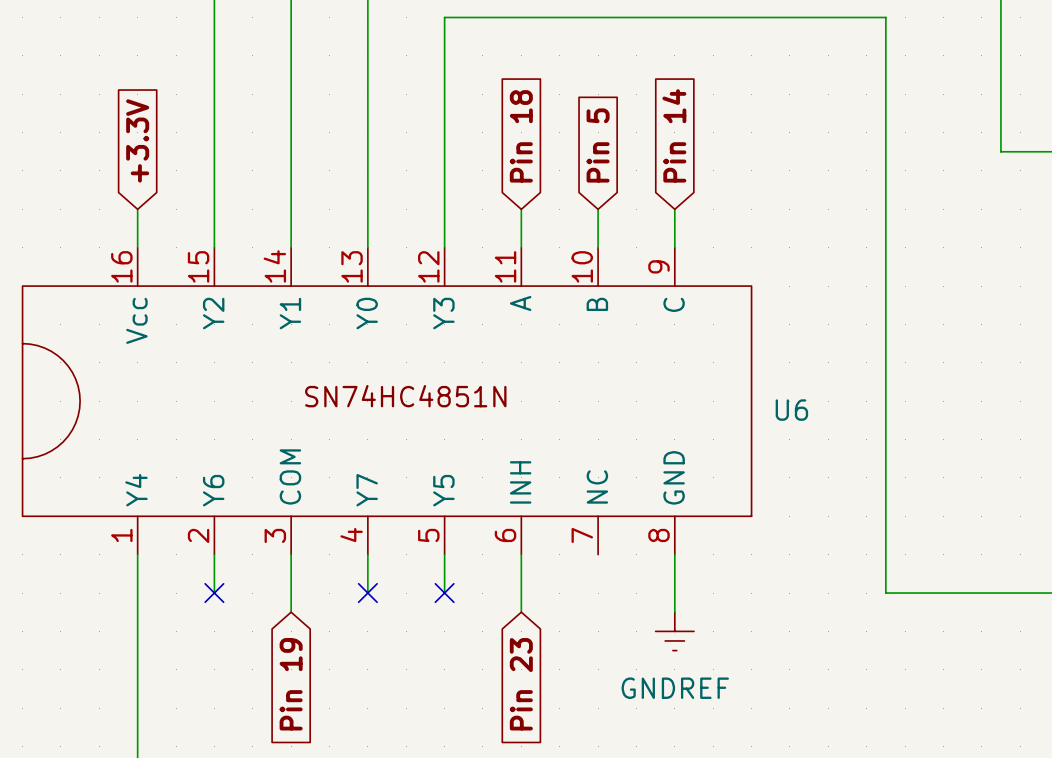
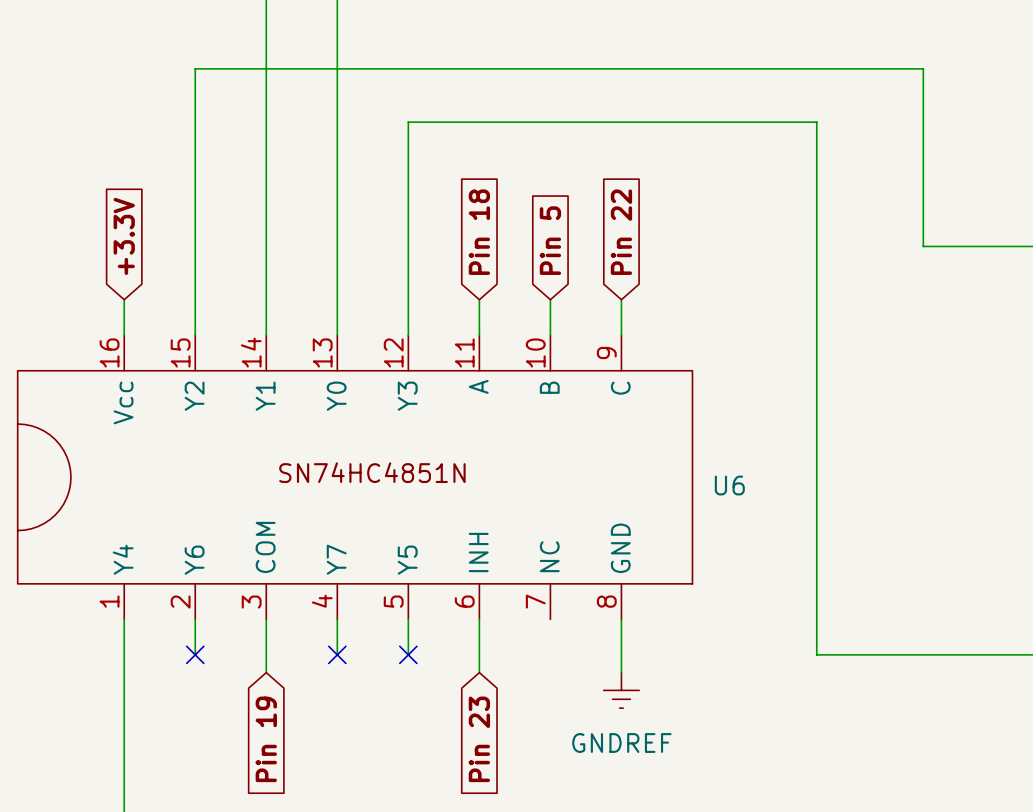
global label: Pin 14 (674, 135) -> Pin 22 (621, 232)

